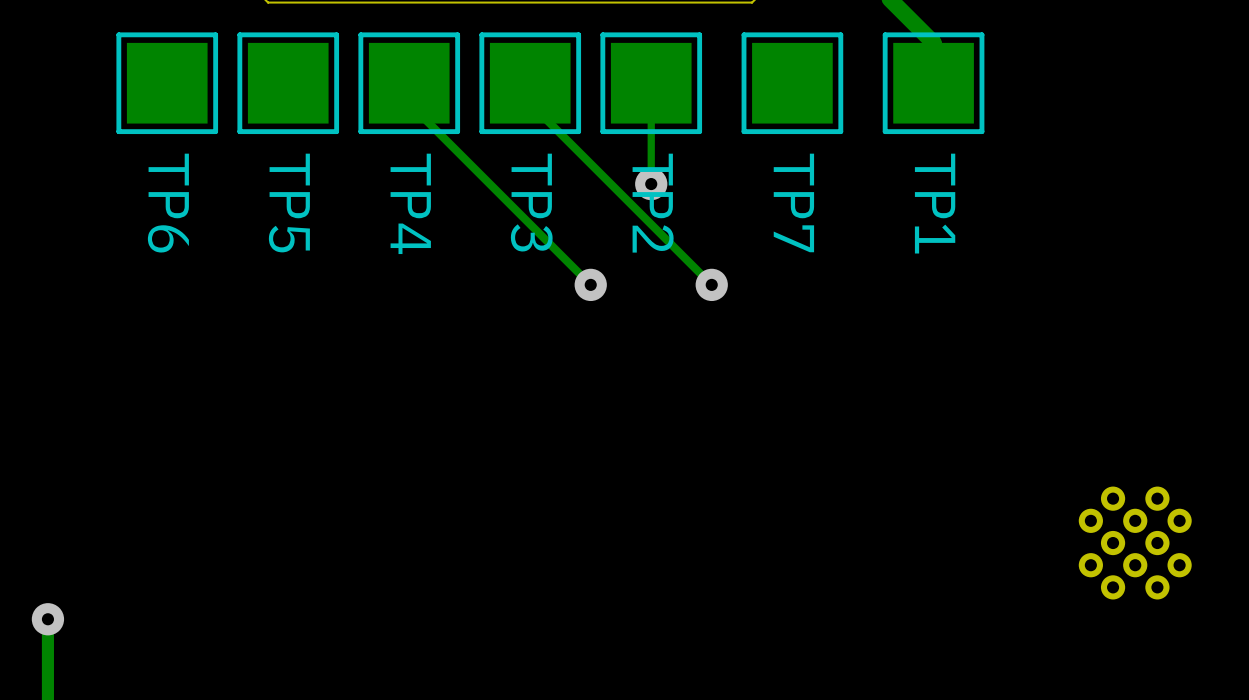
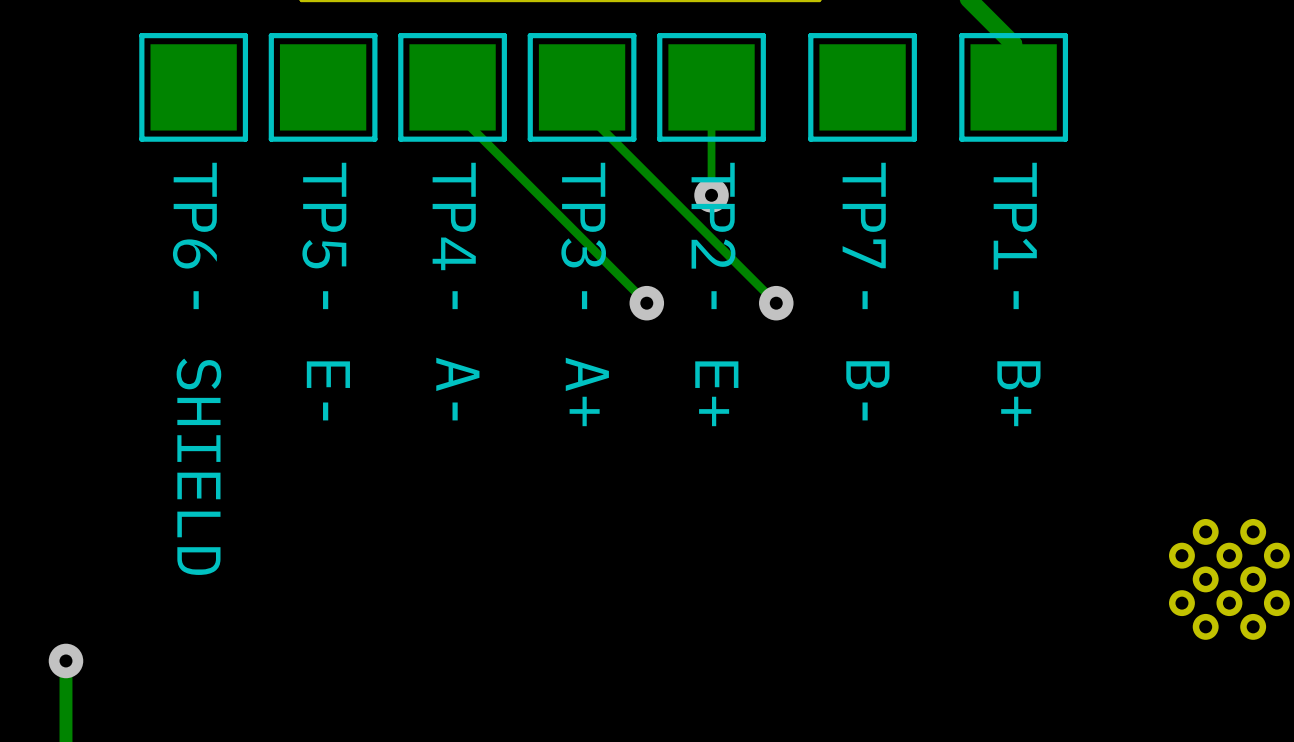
text: none -> - E- (328, 355)
text: none -> - A- (457, 355)
text: none -> - B- (867, 355)
text: none -> - A+ (587, 358)
text: none -> - E+ (716, 358)
text: none -> - B+ (1018, 358)
text: none -> - SHIELD (198, 433)

